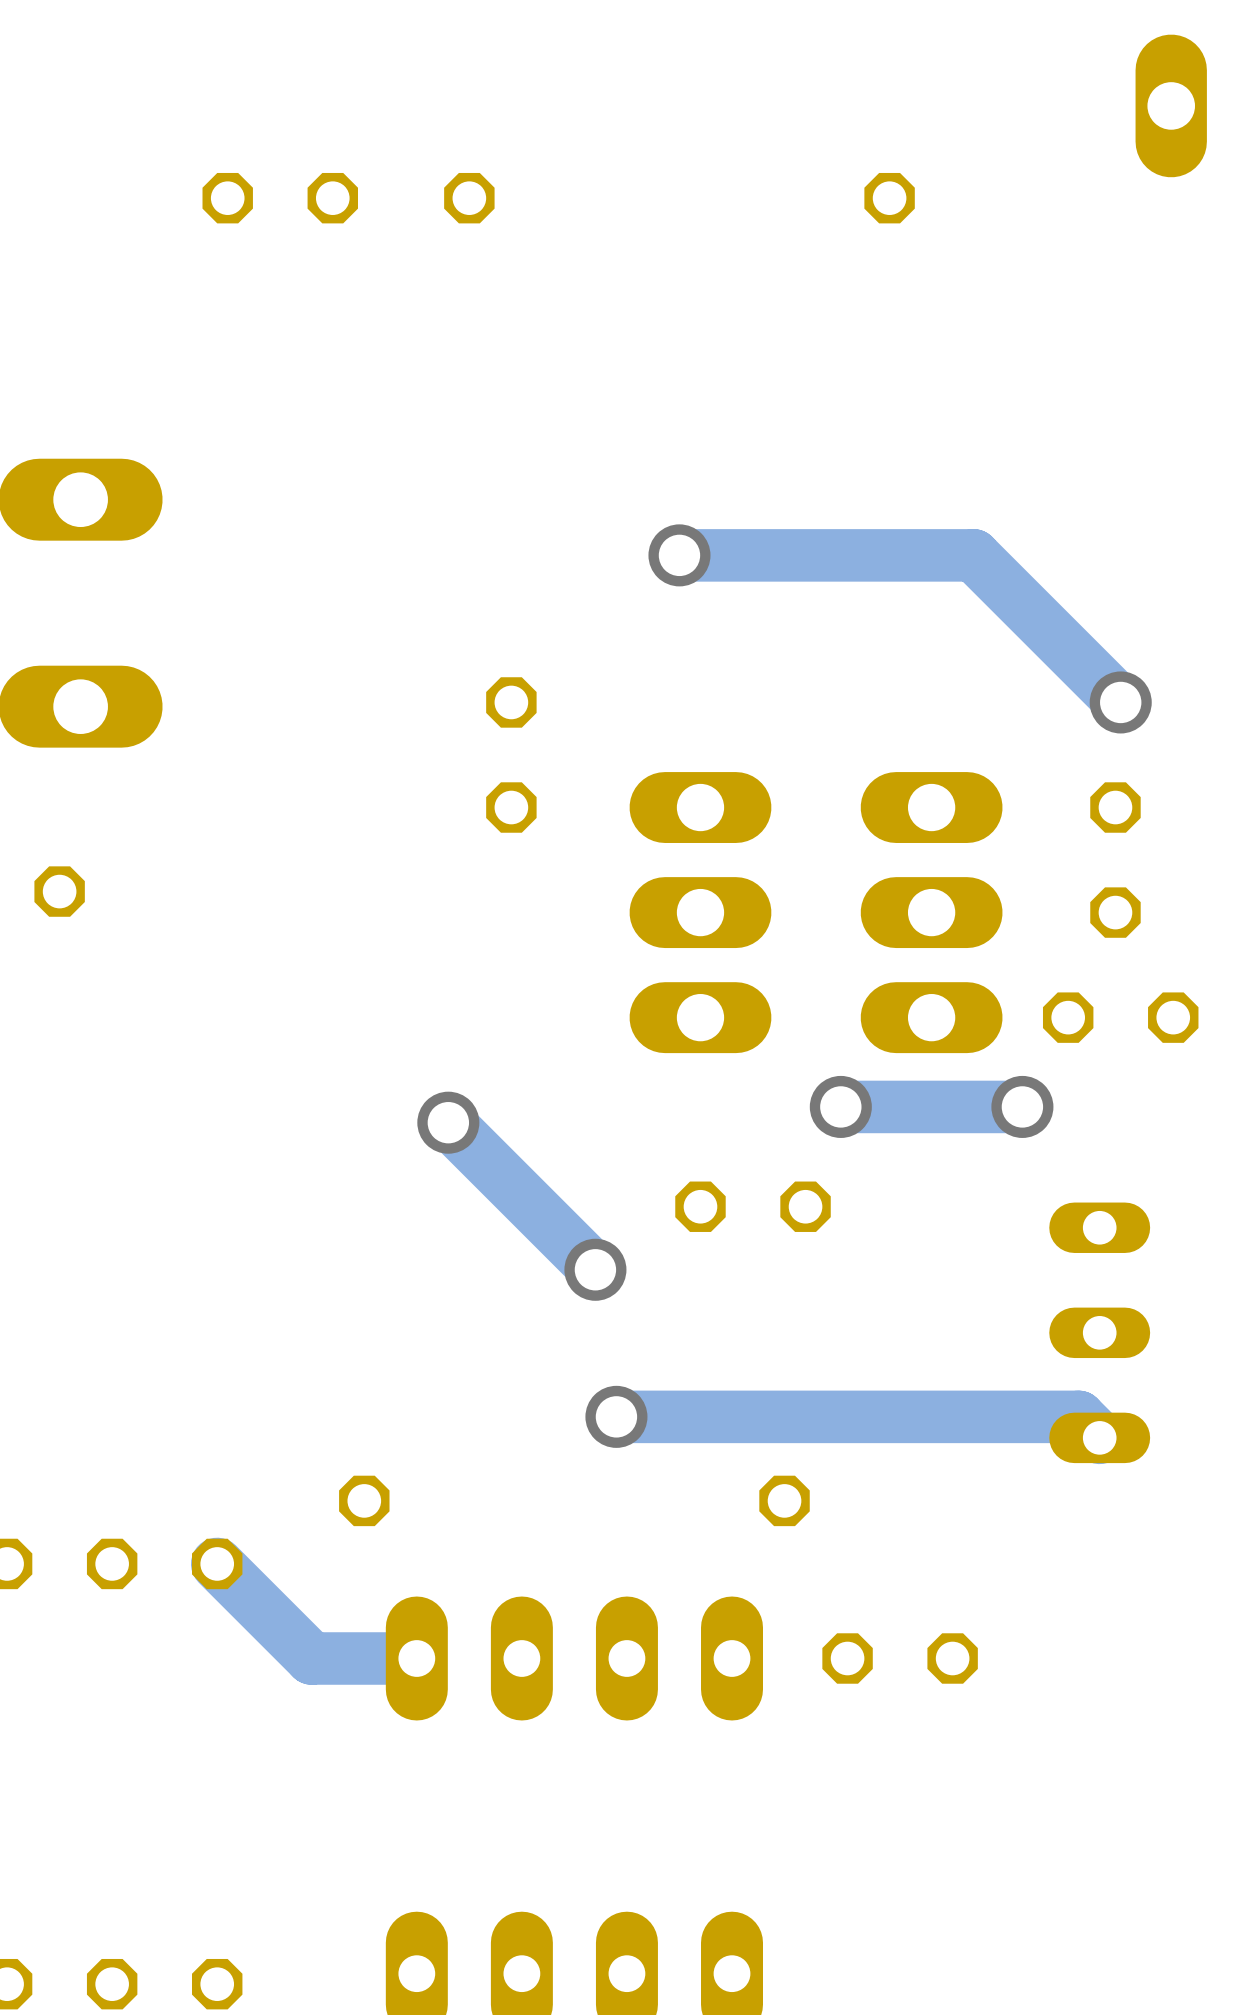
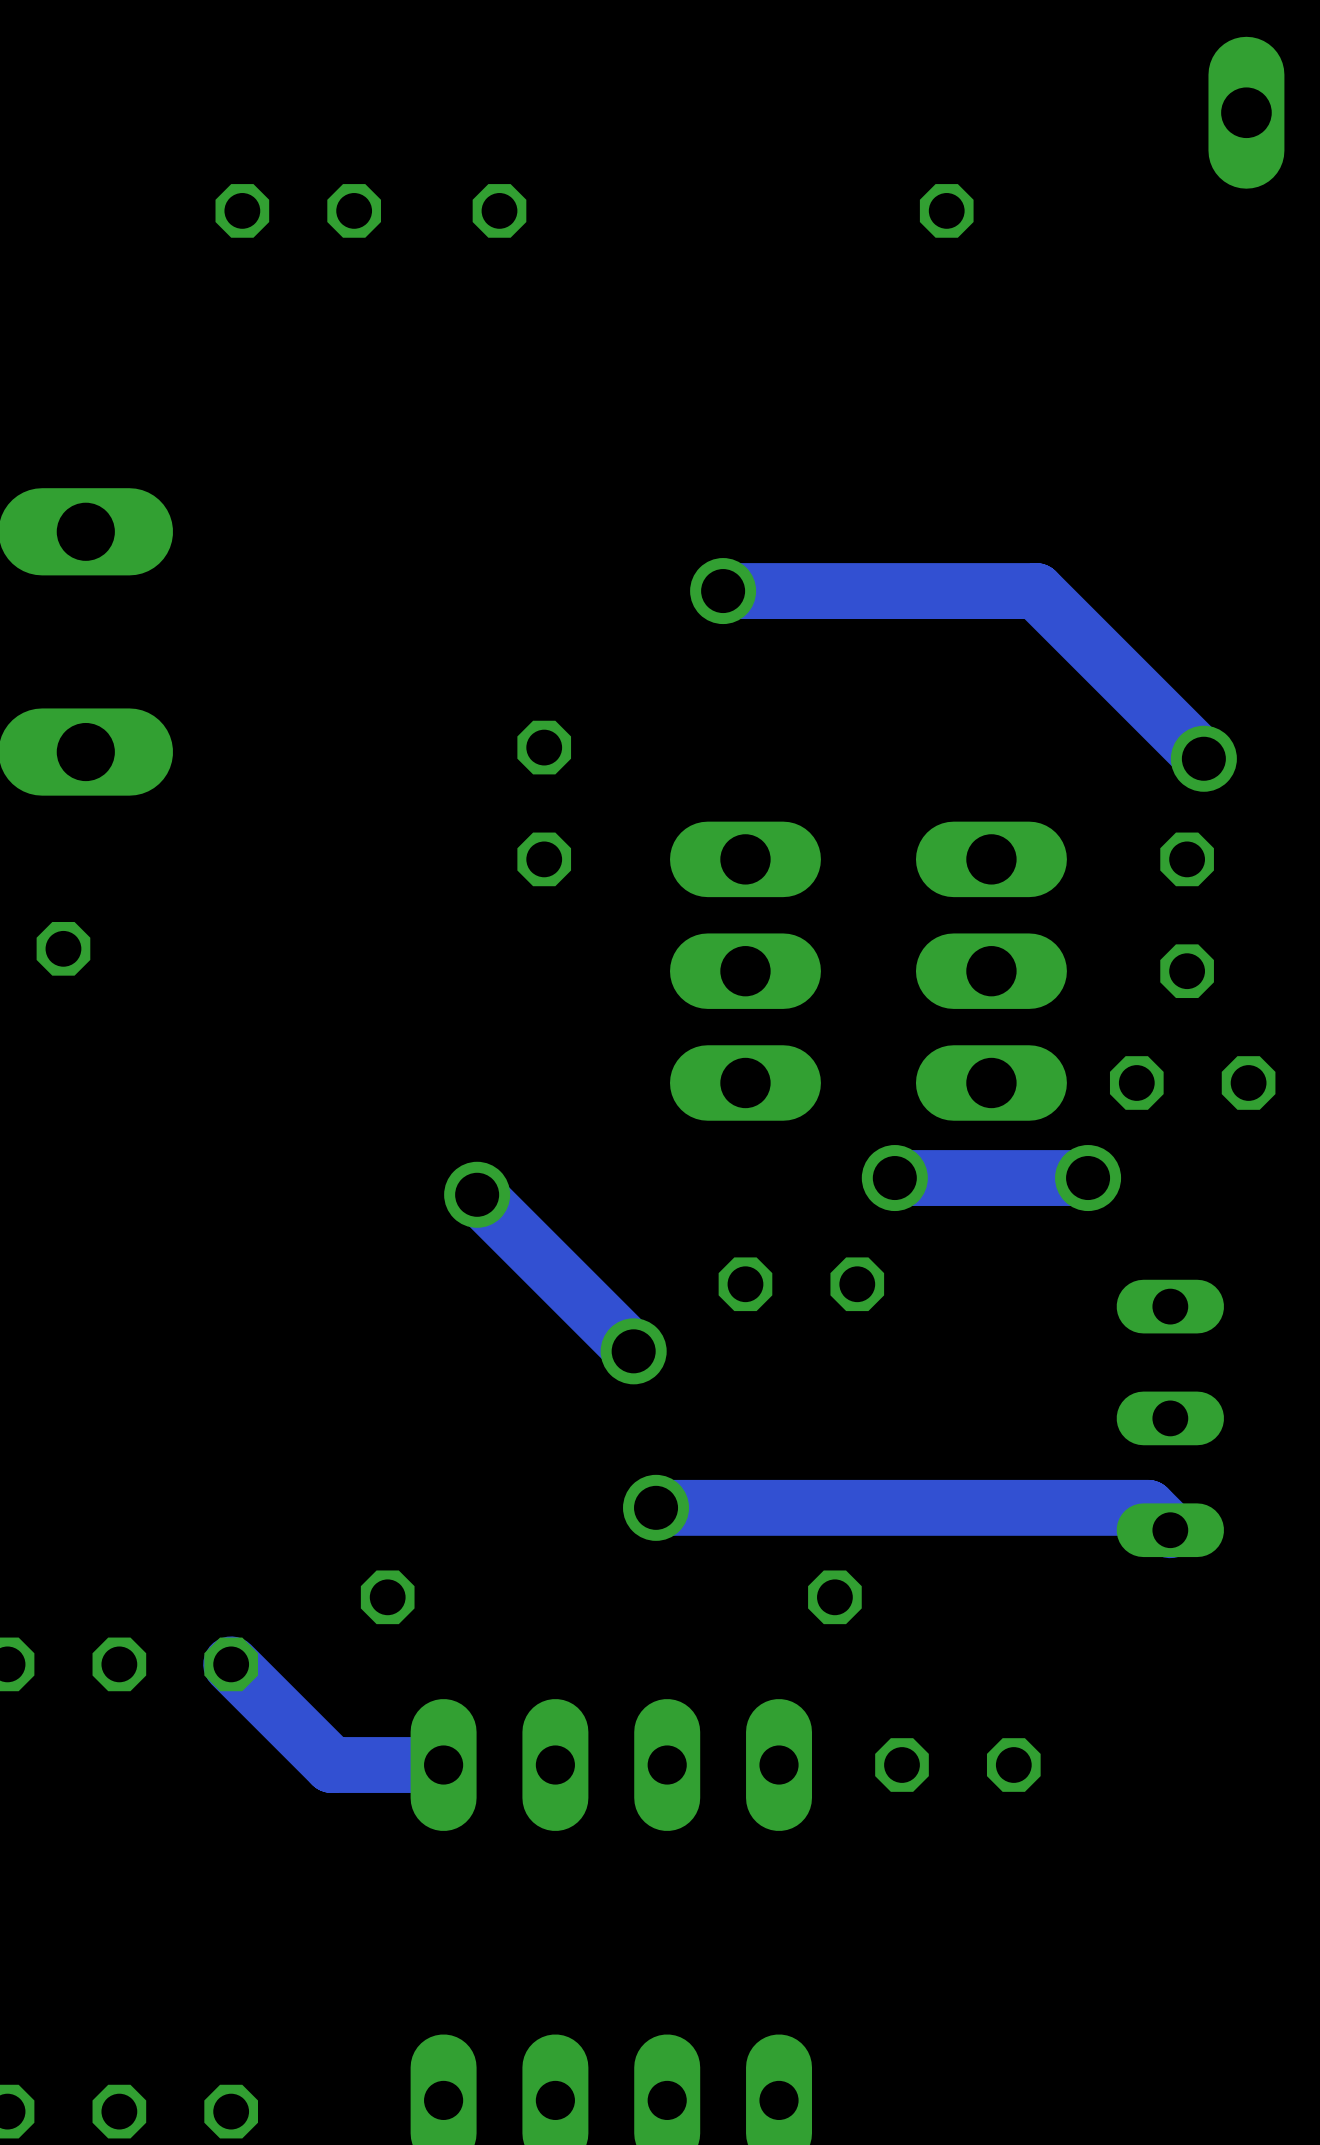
via position: (1120, 702) -> (1203, 758)

